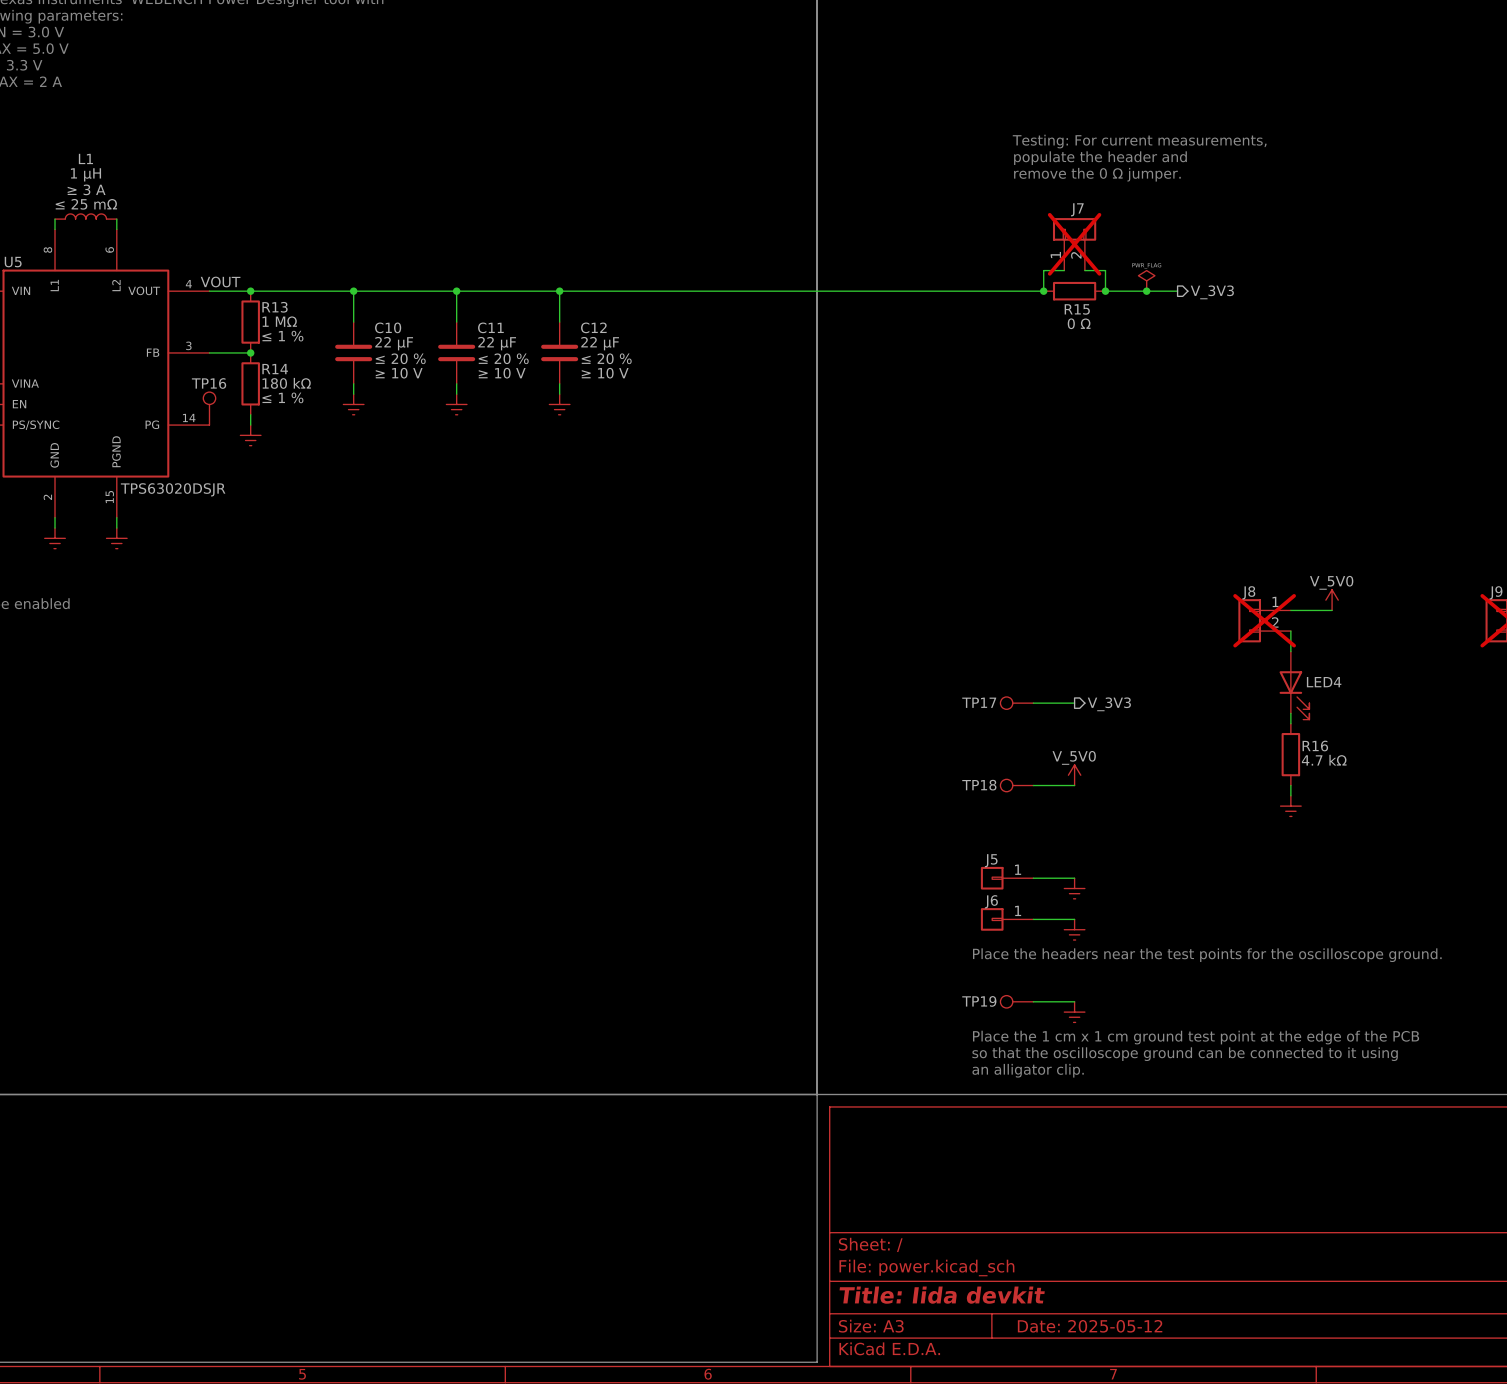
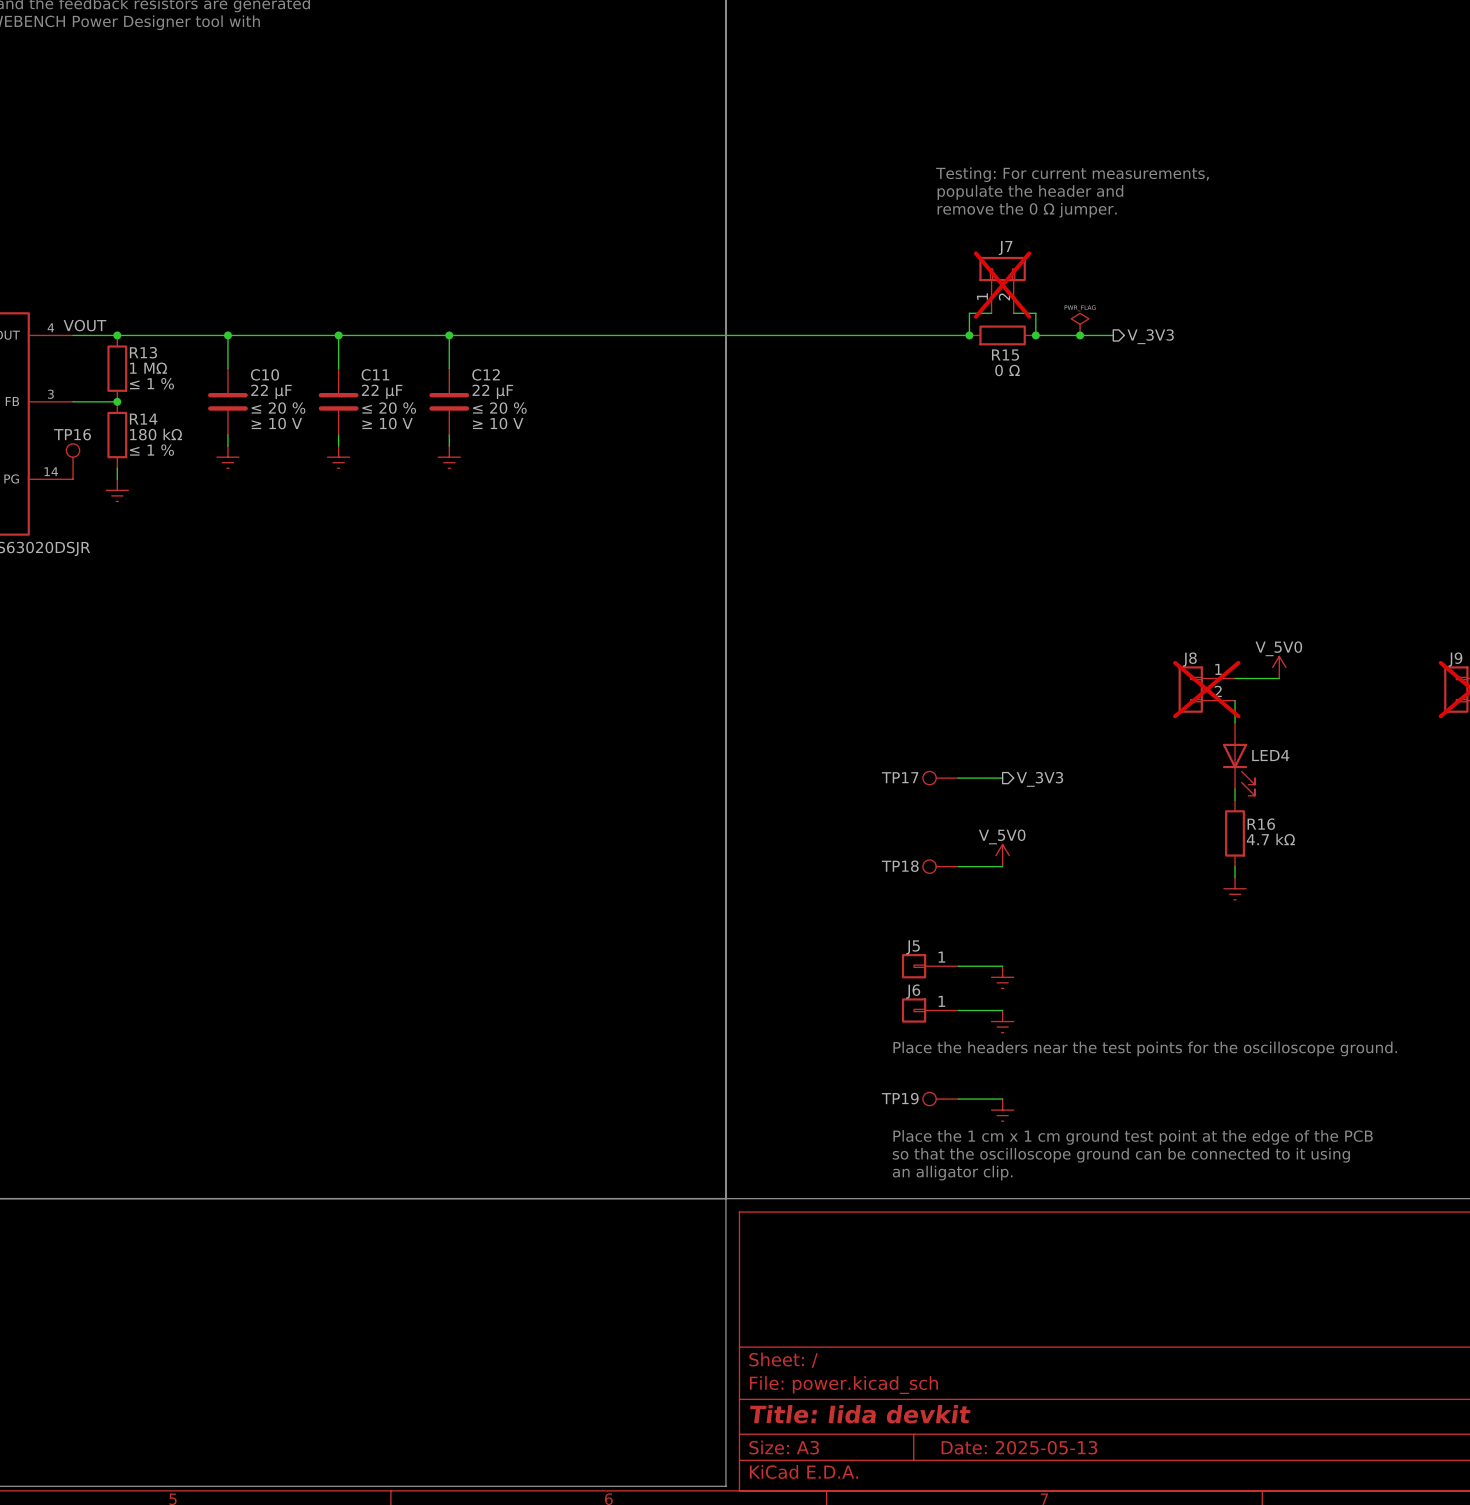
title block: Date: 2025-05-12 (1090, 1326) -> Date: 2025-05-13 (1019, 1447)

